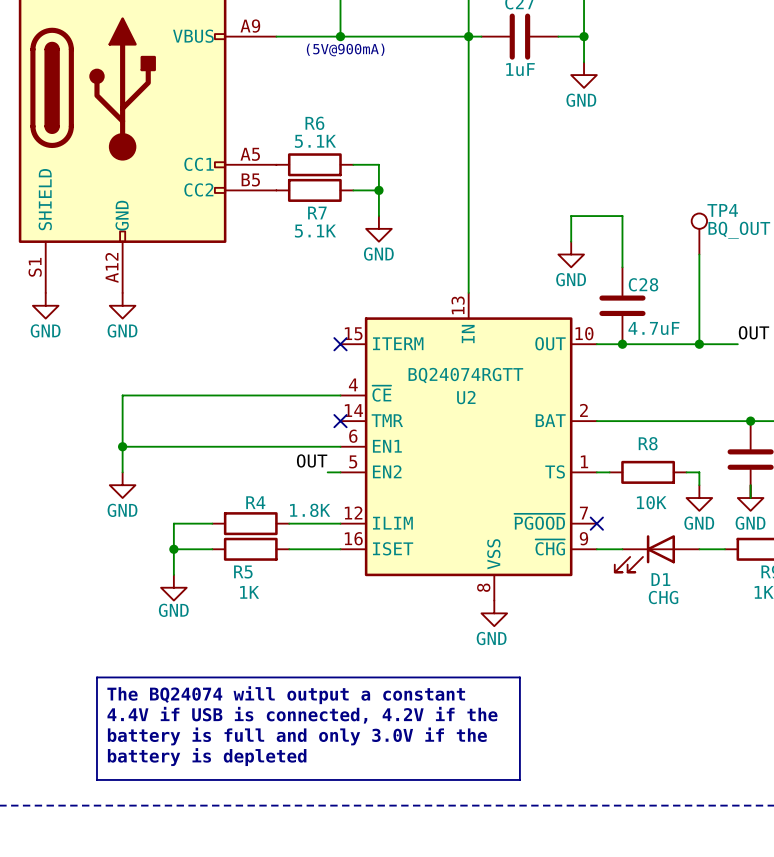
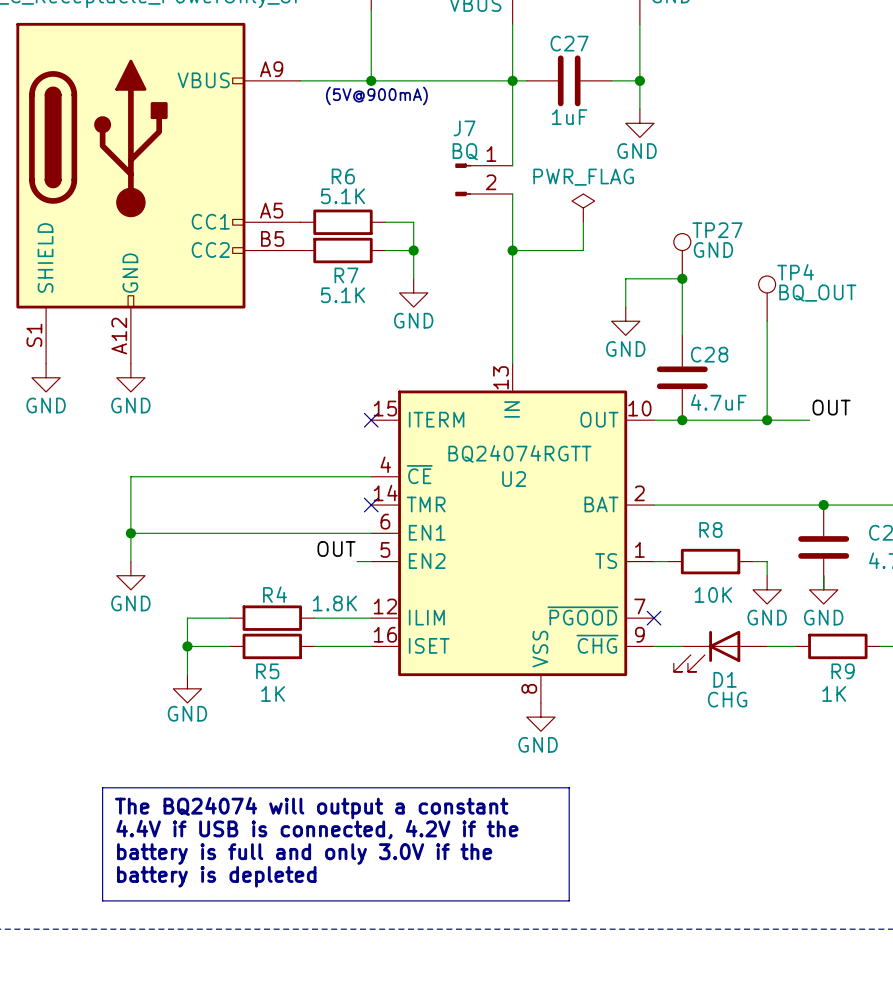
wire: (468, 113) (468, 139) -> none
J7: none -> BQ (483, 179)
power symbol: none -> PWR_FLAG (583, 208)
wire: none -> (583, 222) (583, 250) (512, 250)
junction: none -> (512, 250)
TP27: none -> GND (682, 256)
junction: none -> (682, 278)

